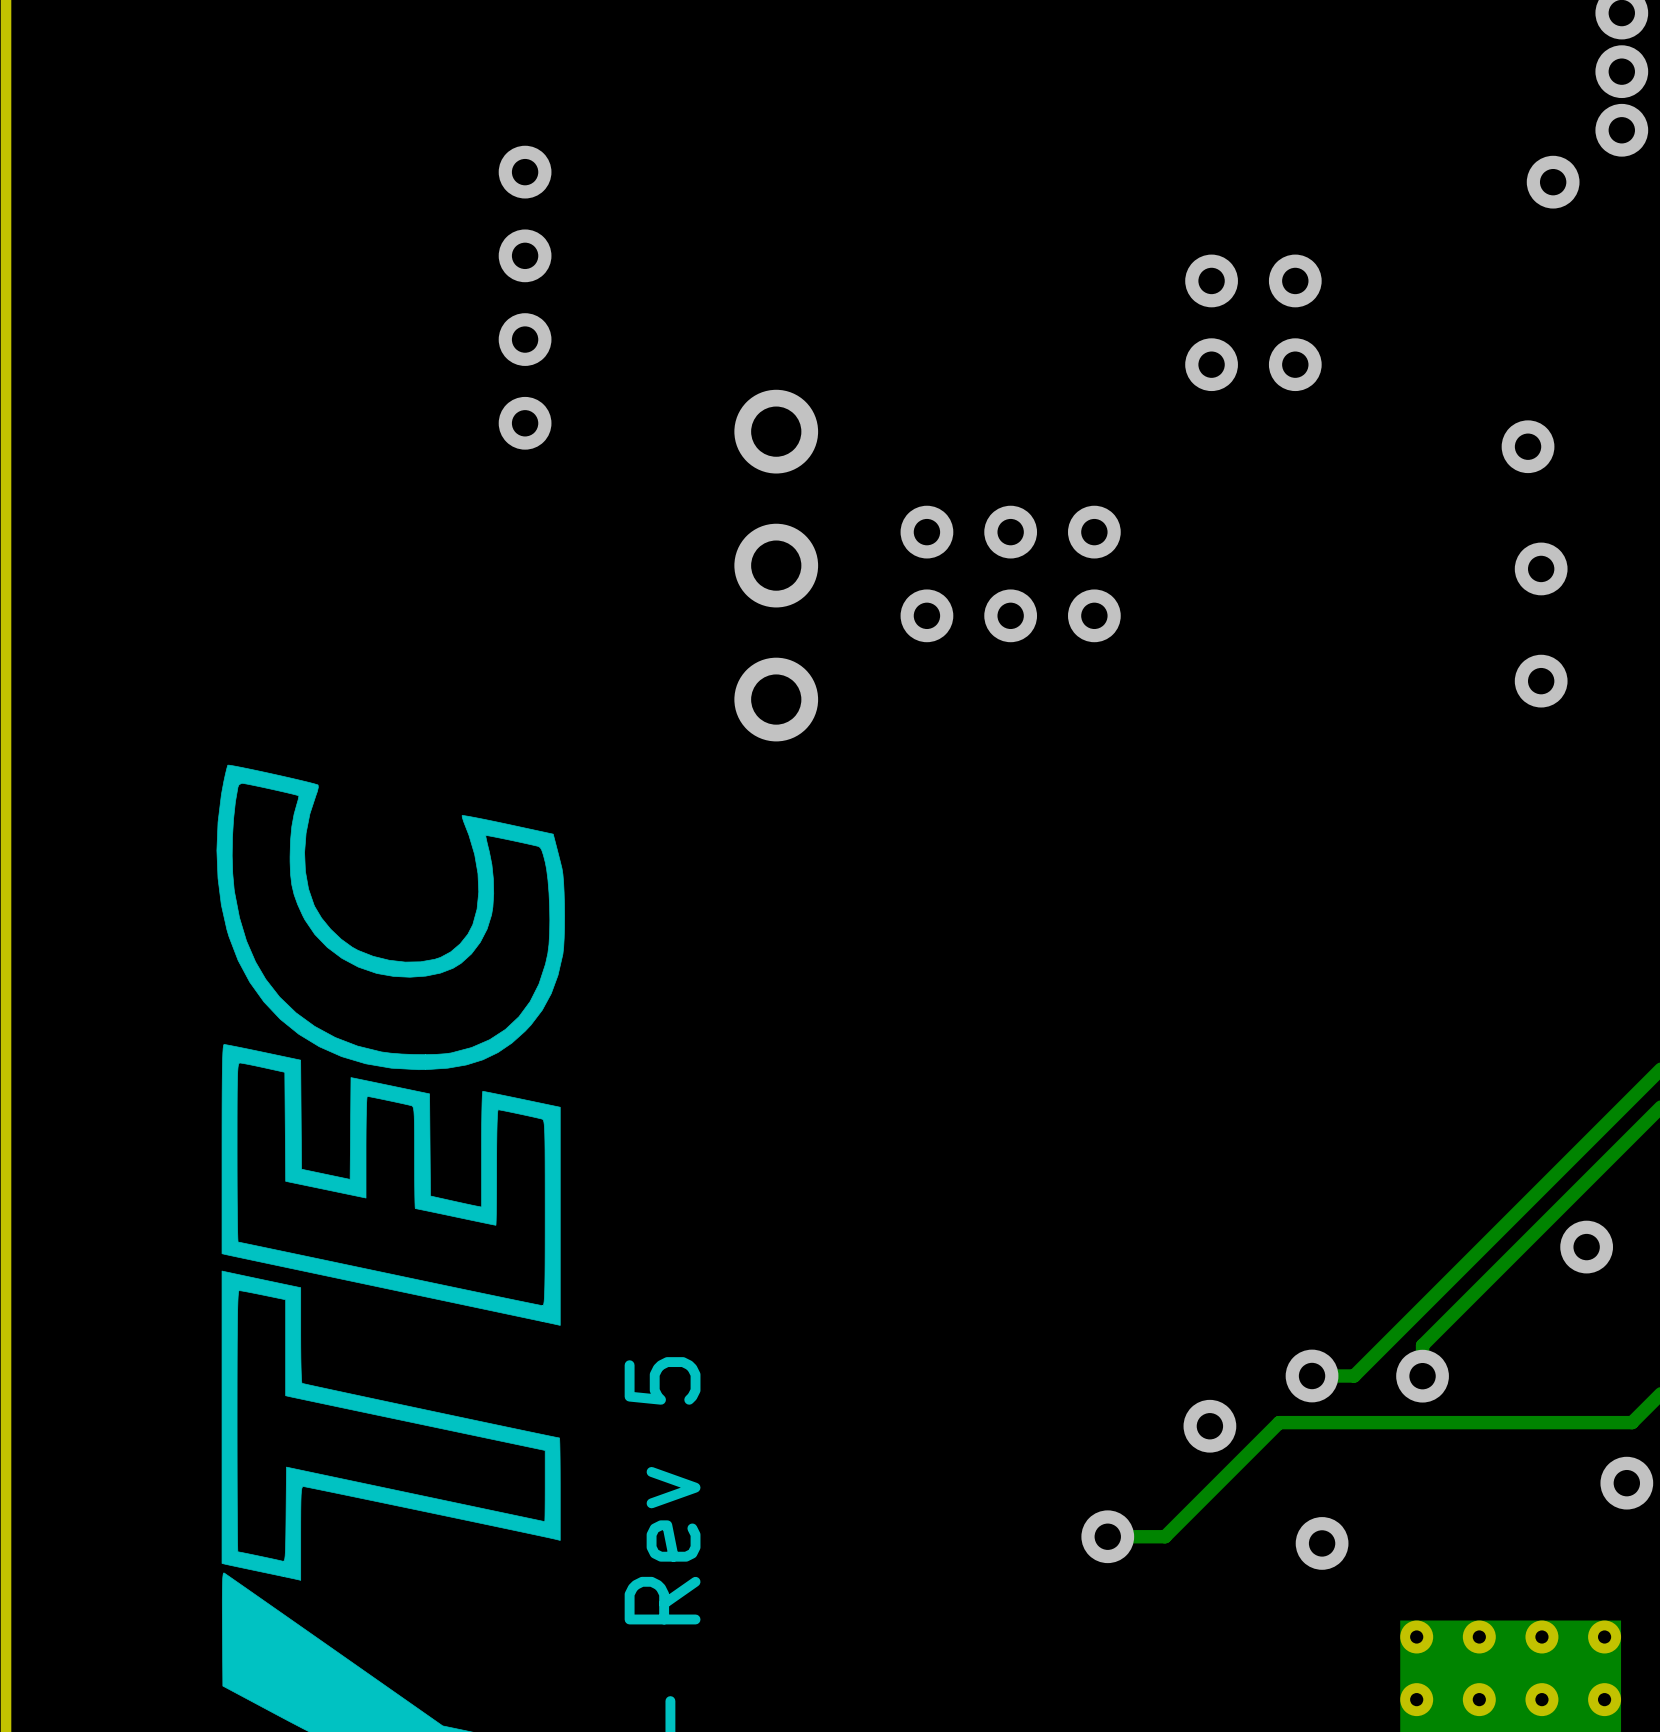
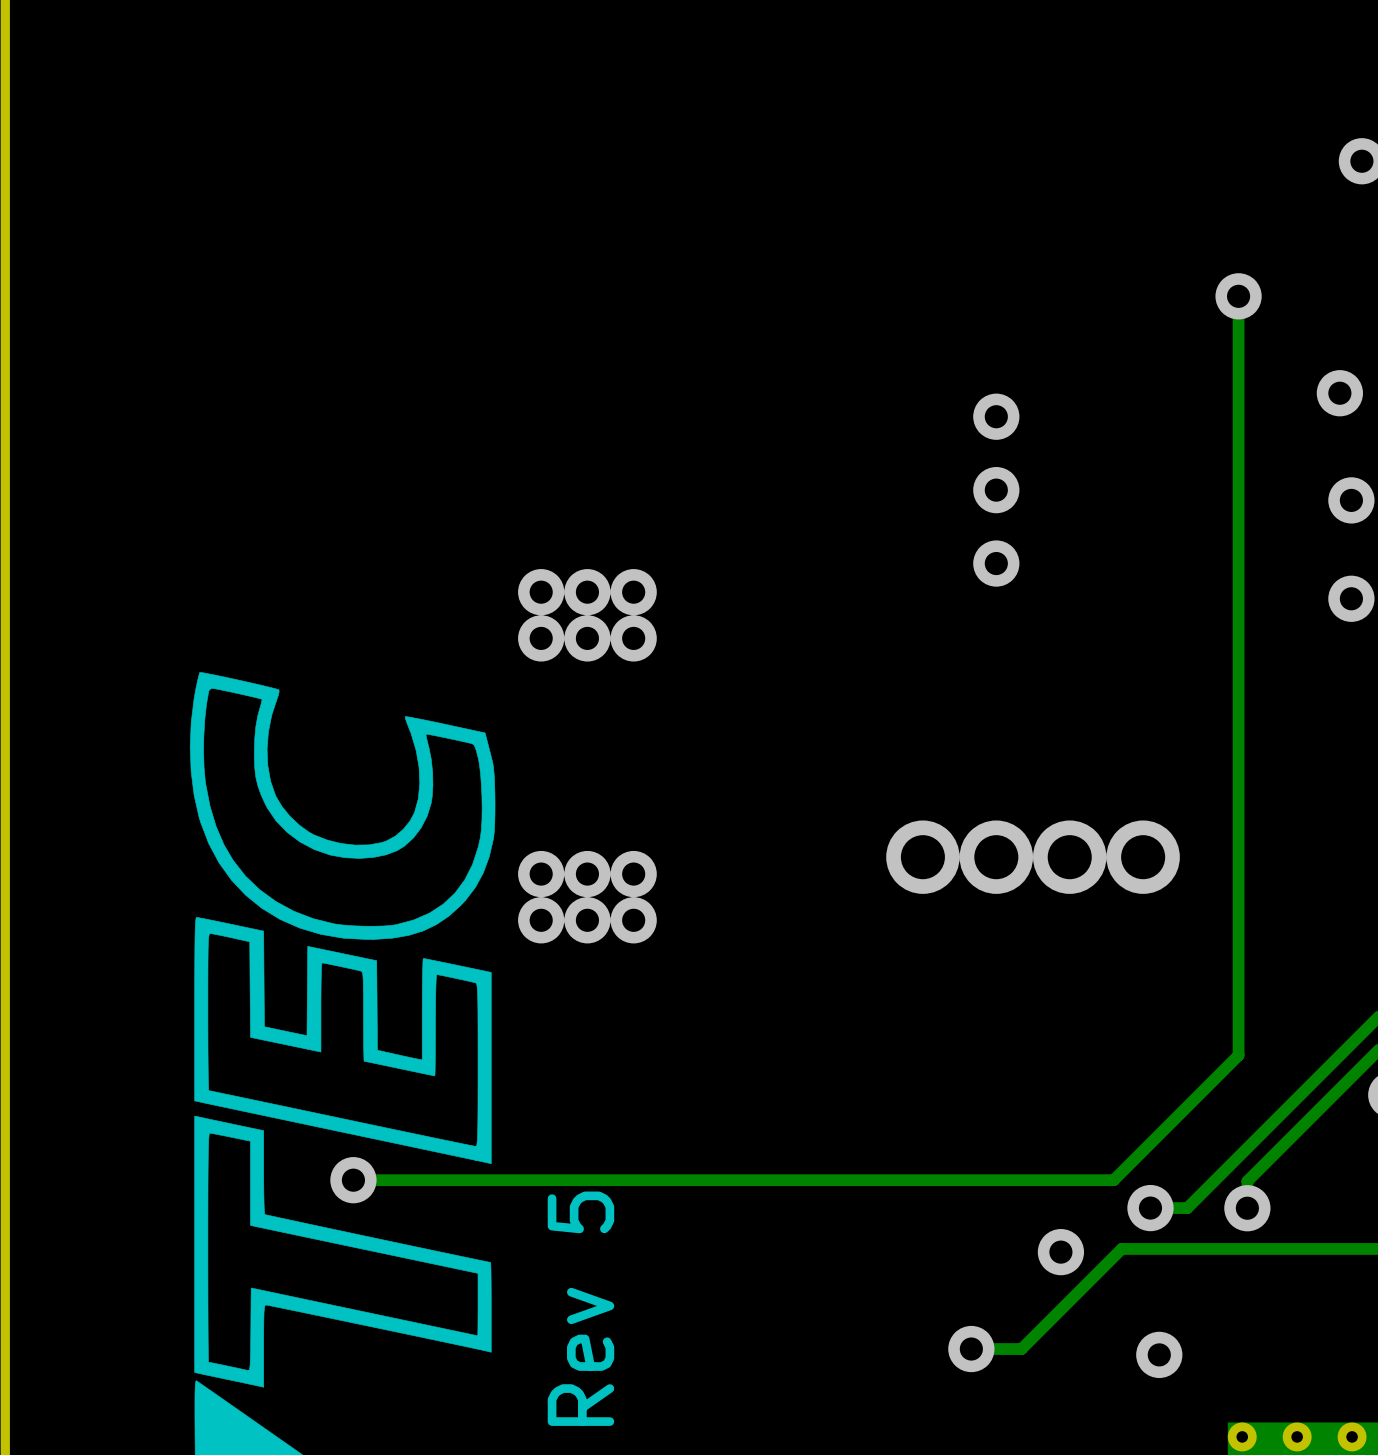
via: (525, 172) -> none
via: (525, 255) -> none
via: (1211, 280) -> none
via: (1295, 280) -> none
track: none -> (1238, 296) (1238, 1055) (1113, 1180) (353, 1180)
via: none -> (1238, 296)
via: (525, 339) -> none
via: (1211, 364) -> none
via: (1295, 364) -> none
via: (525, 423) -> none
via: (776, 431) -> none
via: none -> (996, 416)
via: (926, 532) -> none
via: (1010, 532) -> none
via position: (1094, 532) -> (996, 490)
via: (776, 565) -> none
via: (926, 615) -> none
via: (1010, 615) -> none
via position: (1094, 615) -> (996, 563)
via: none -> (541, 592)
via: none -> (587, 592)
via: none -> (633, 592)
via: (776, 699) -> none
via: none -> (541, 638)
via: none -> (587, 638)
via: none -> (633, 638)
via: none -> (922, 857)
via: none -> (996, 857)
via: none -> (1069, 857)
via: none -> (1143, 857)
via: none -> (541, 874)
via: none -> (587, 874)
via: none -> (633, 874)
via: none -> (541, 920)
via: none -> (587, 920)
via: none -> (633, 920)
via: none -> (353, 1180)

